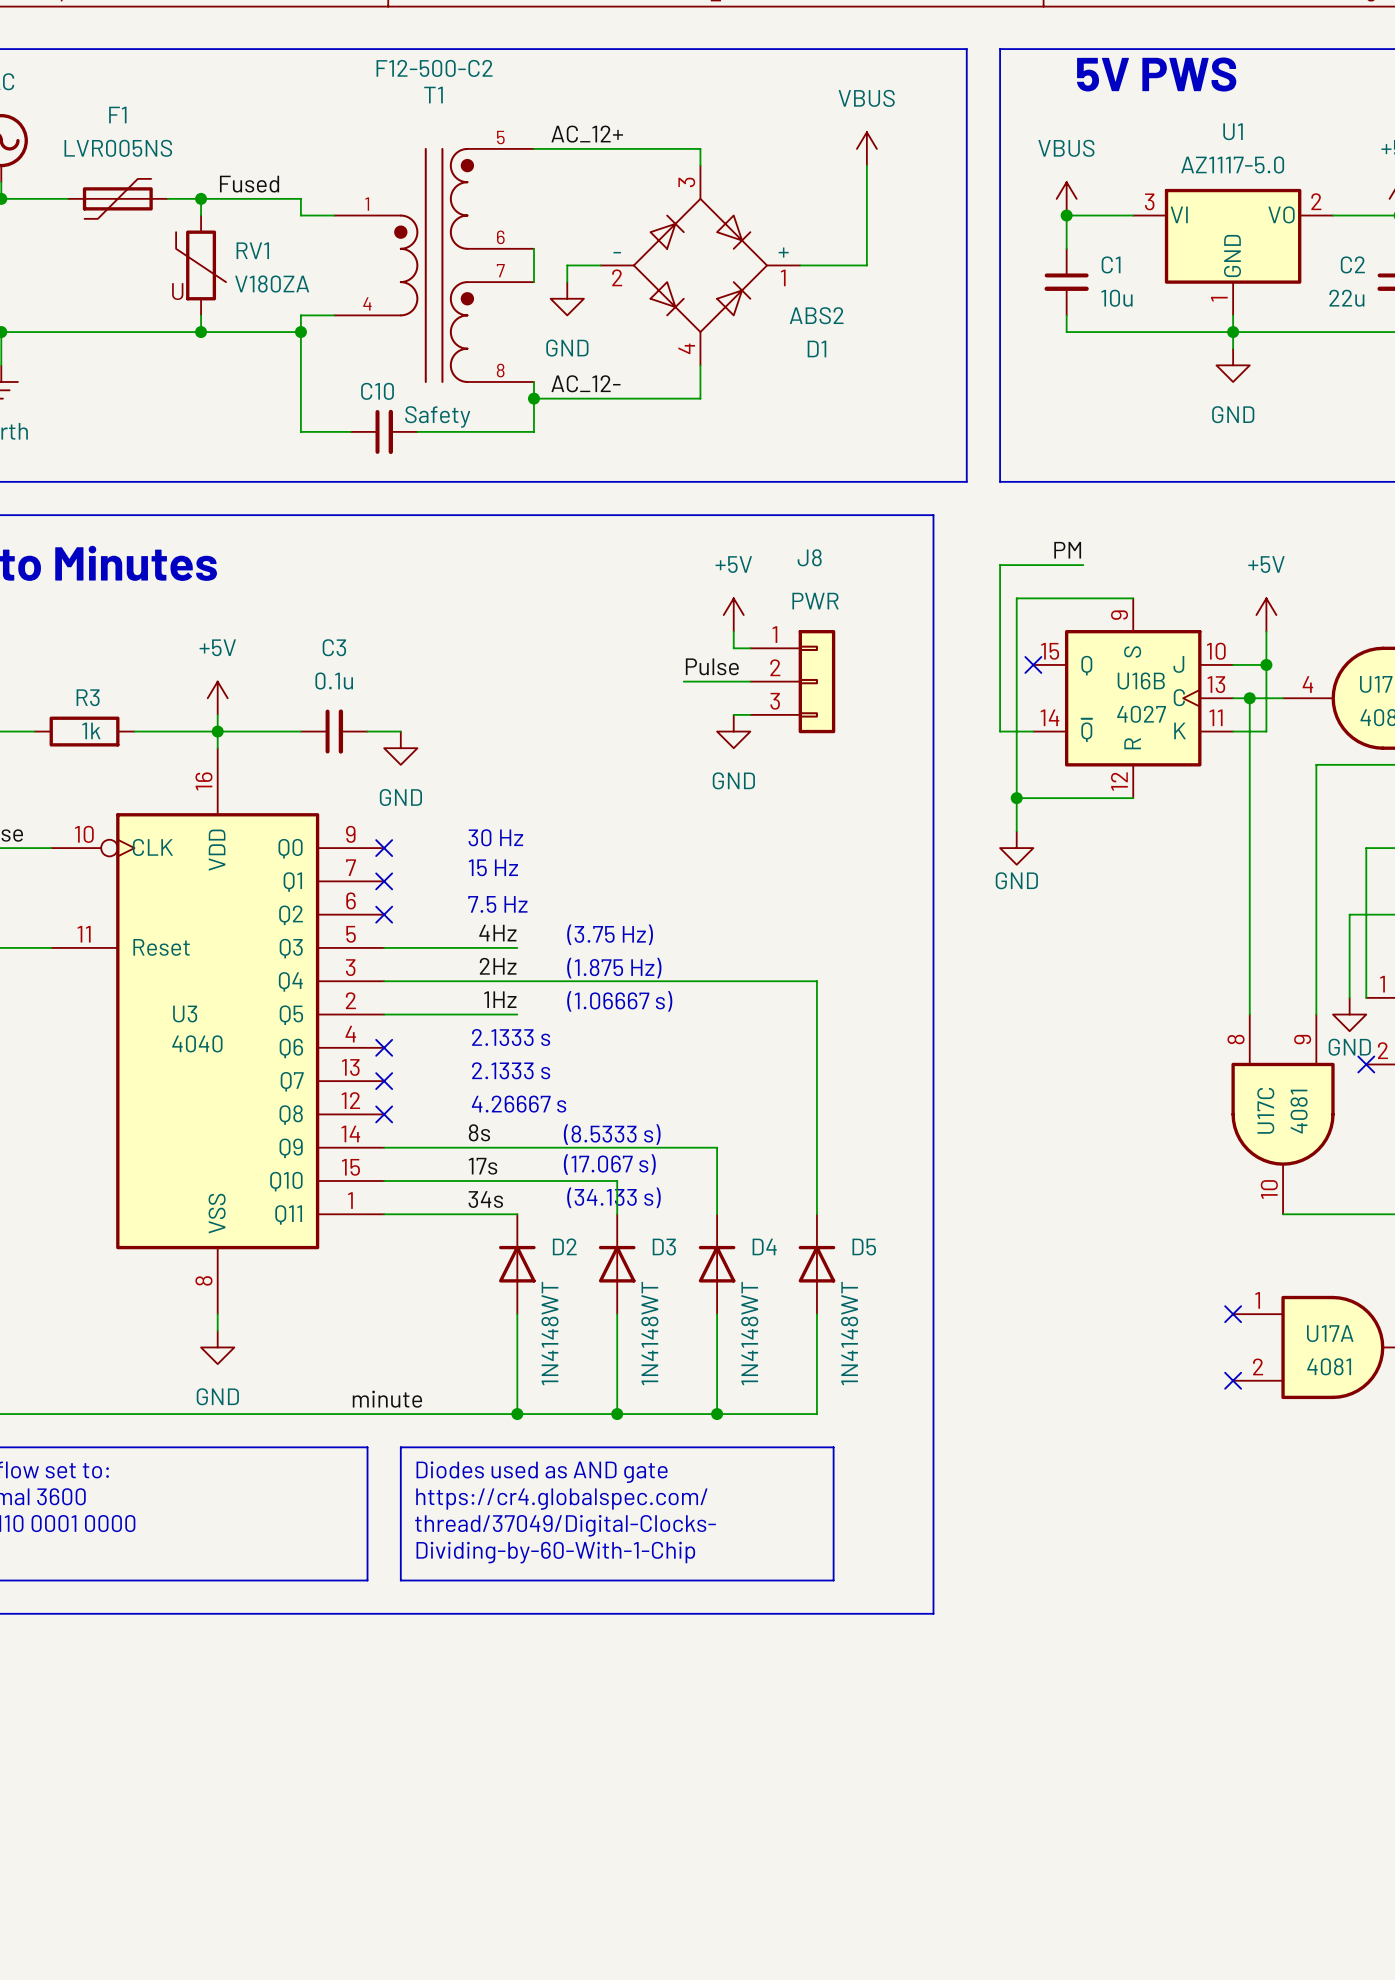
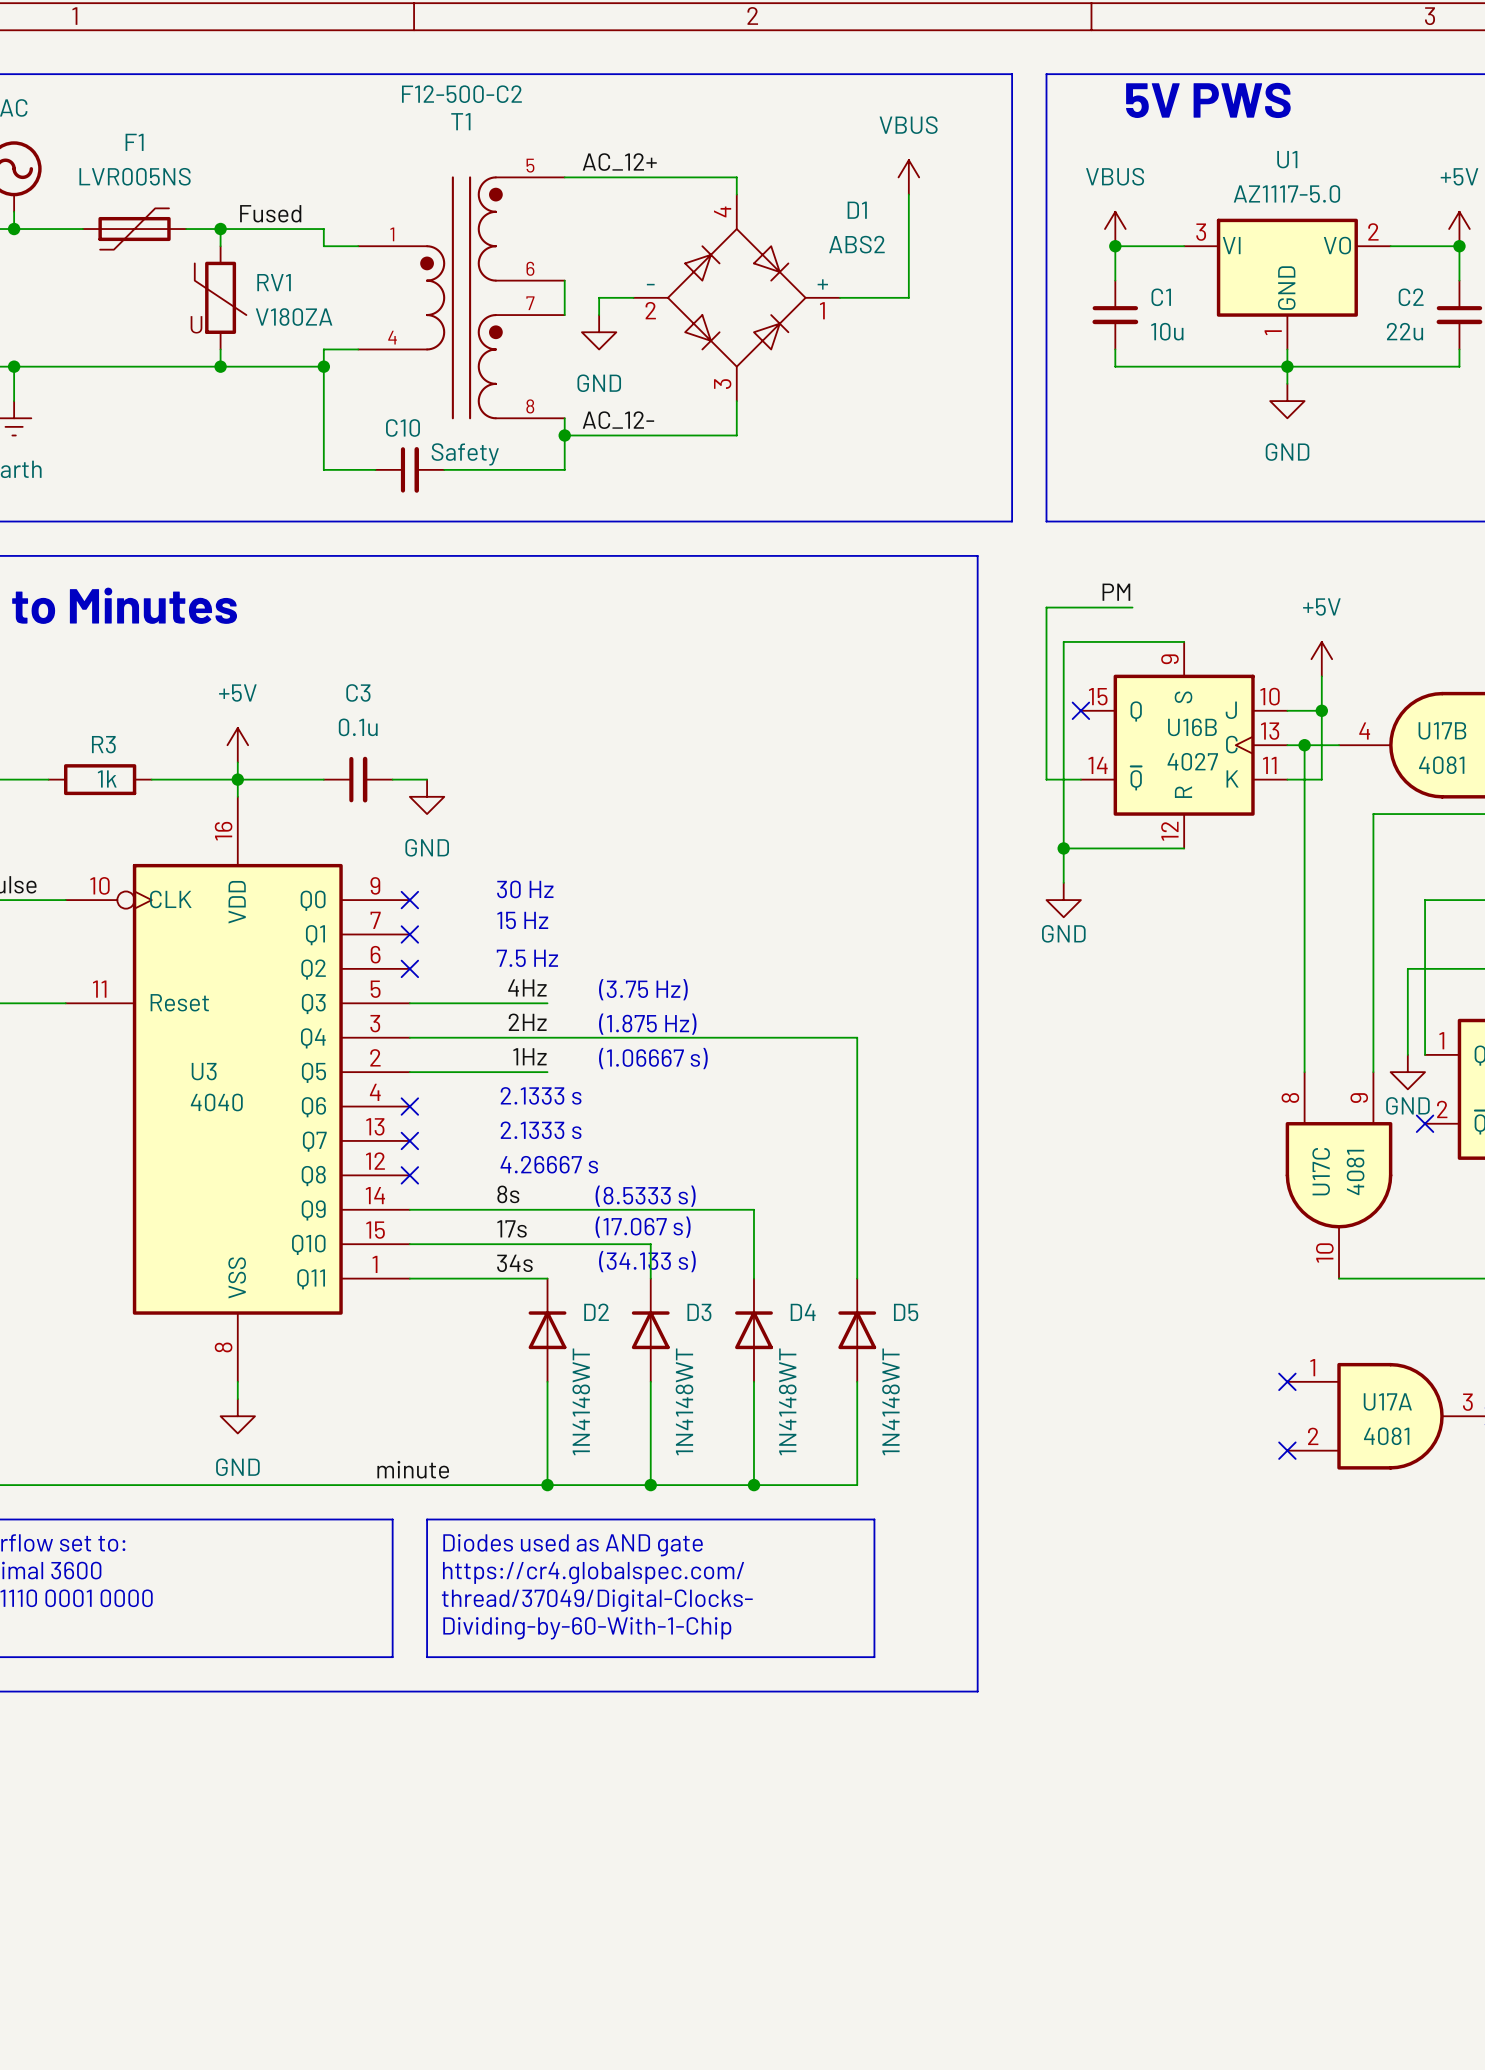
D1 flip: as is (700, 265) -> up-down (736, 297)
power symbol: +5V (733, 615) -> none
wire: (733, 631) (733, 648) (750, 648) -> none
label: Pulse (712, 666) -> none
wire: (683, 681) (750, 681) -> none
J8: PWR (792, 681) -> none
wire: (733, 714) (750, 714) -> none
power symbol: GND (733, 731) -> none

